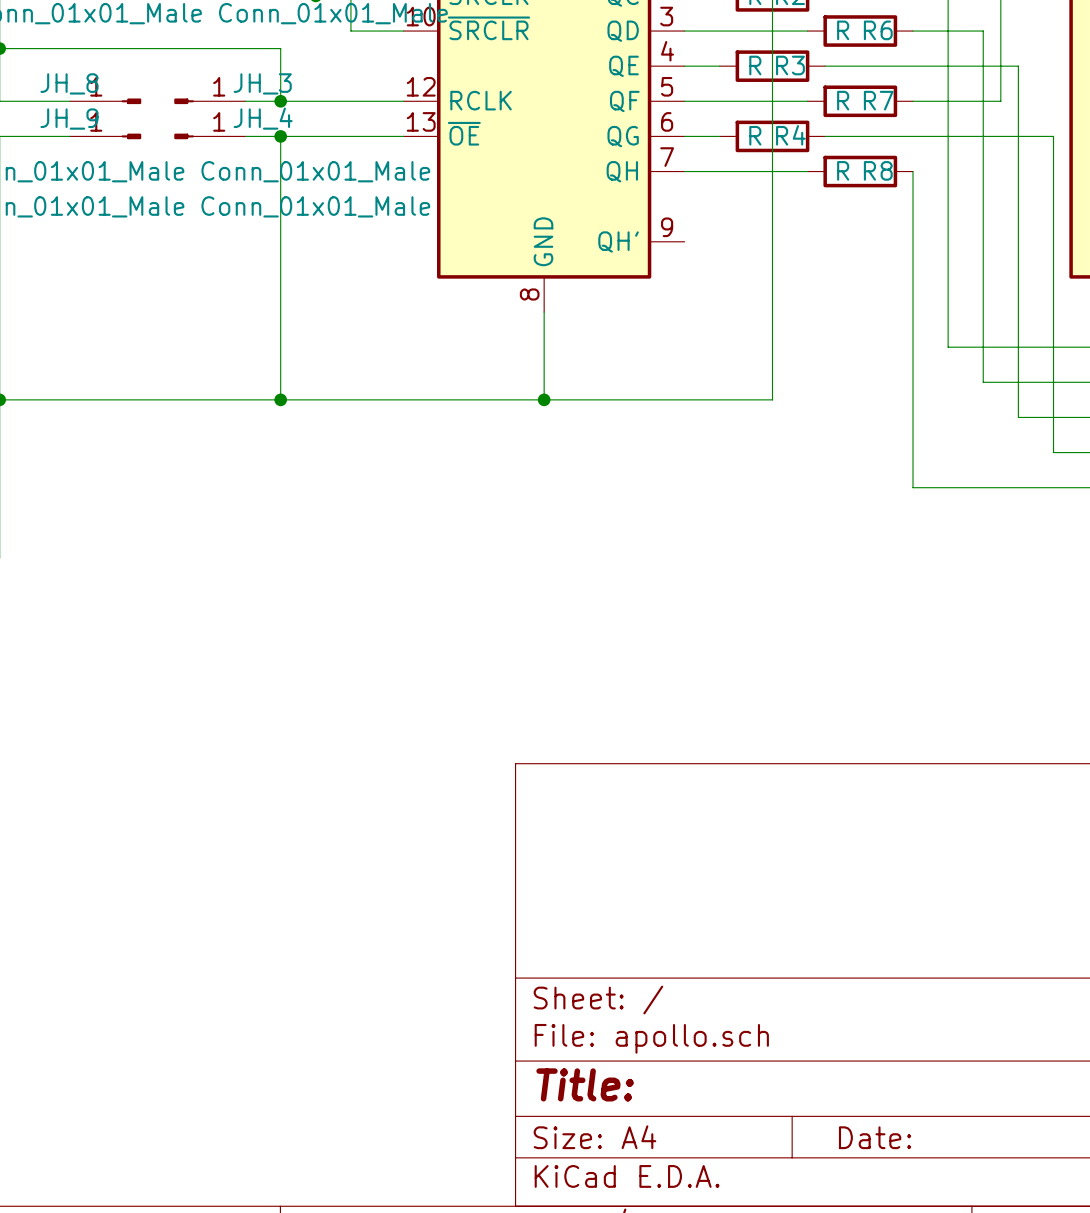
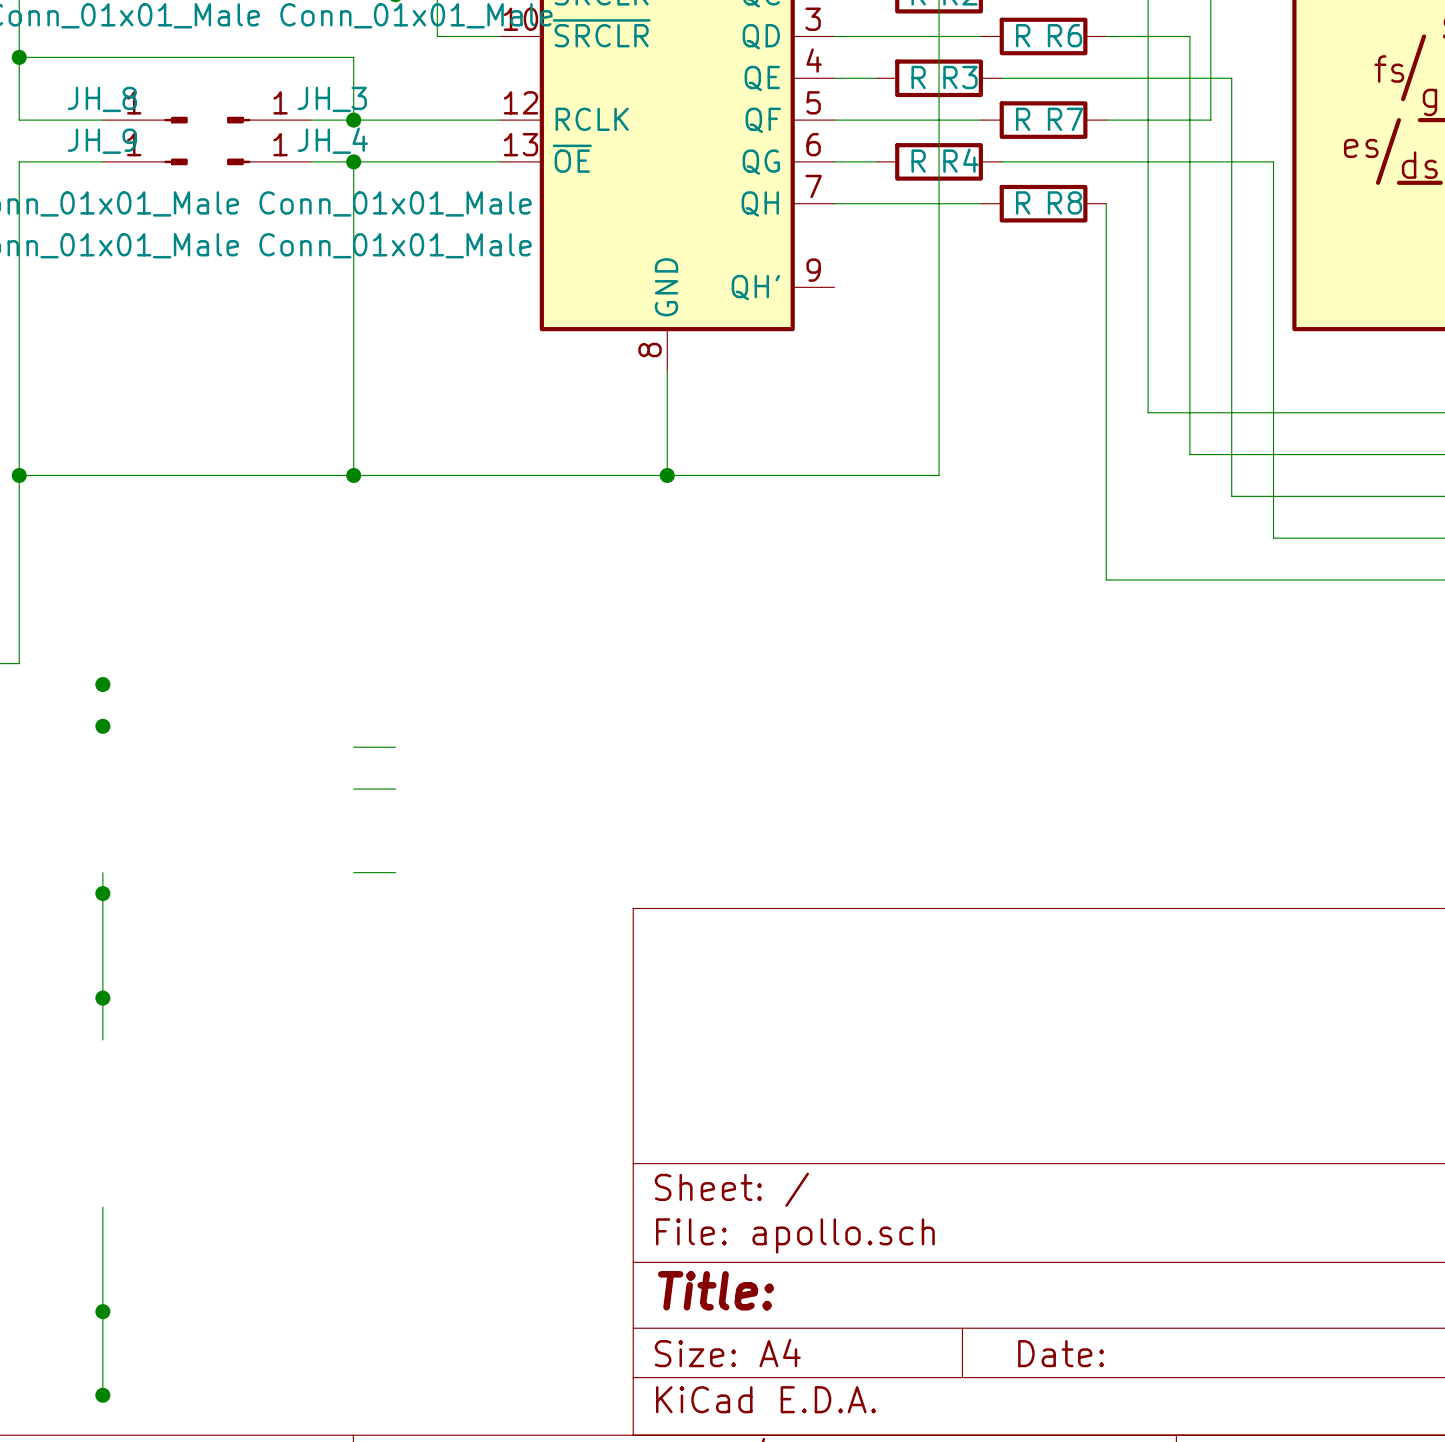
junction: none -> (102, 684)
junction: none -> (102, 726)
wire: none -> (353, 747) (395, 747)
wire: none -> (353, 789) (395, 789)
wire: none -> (102, 872) (102, 1039)
wire: none -> (353, 872) (395, 872)
junction: none -> (102, 893)
junction: none -> (102, 998)
wire: none -> (102, 1207) (102, 1395)
junction: none -> (102, 1311)
junction: none -> (102, 1395)

